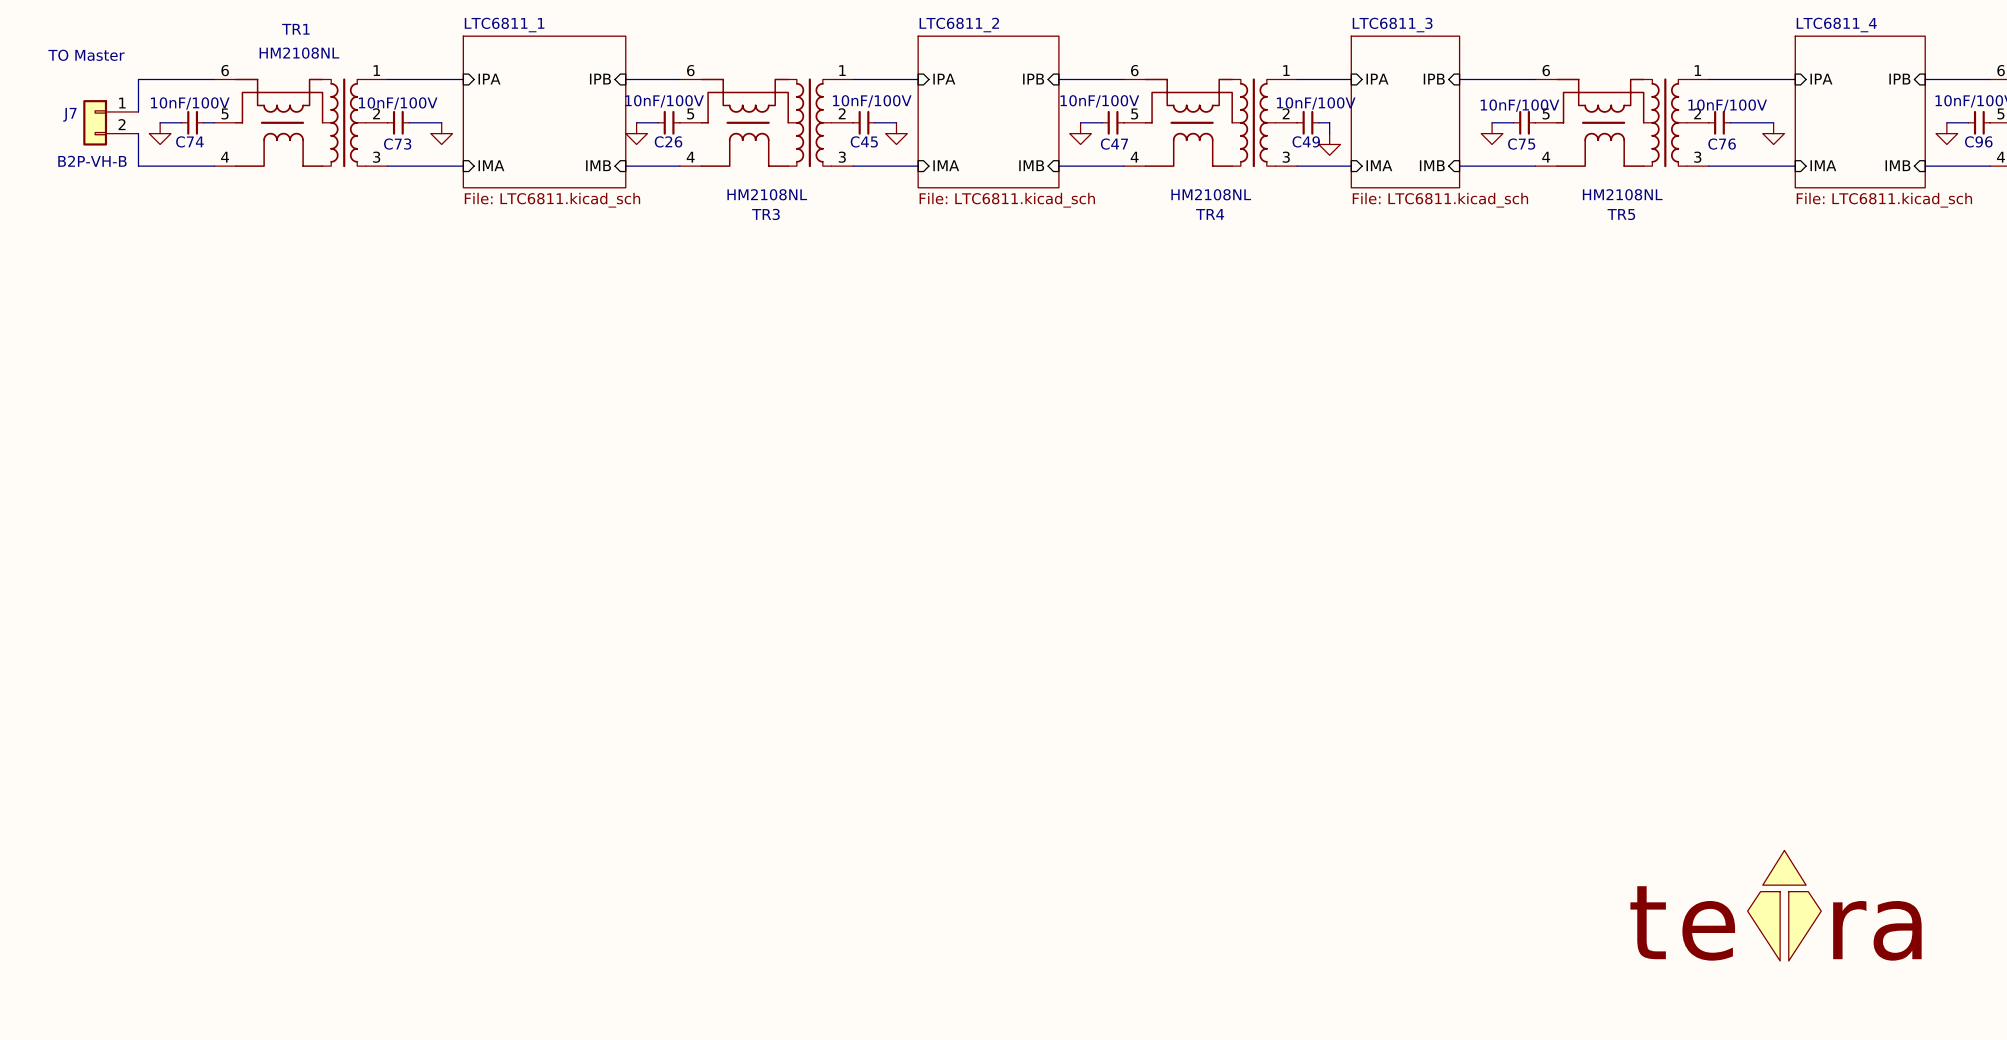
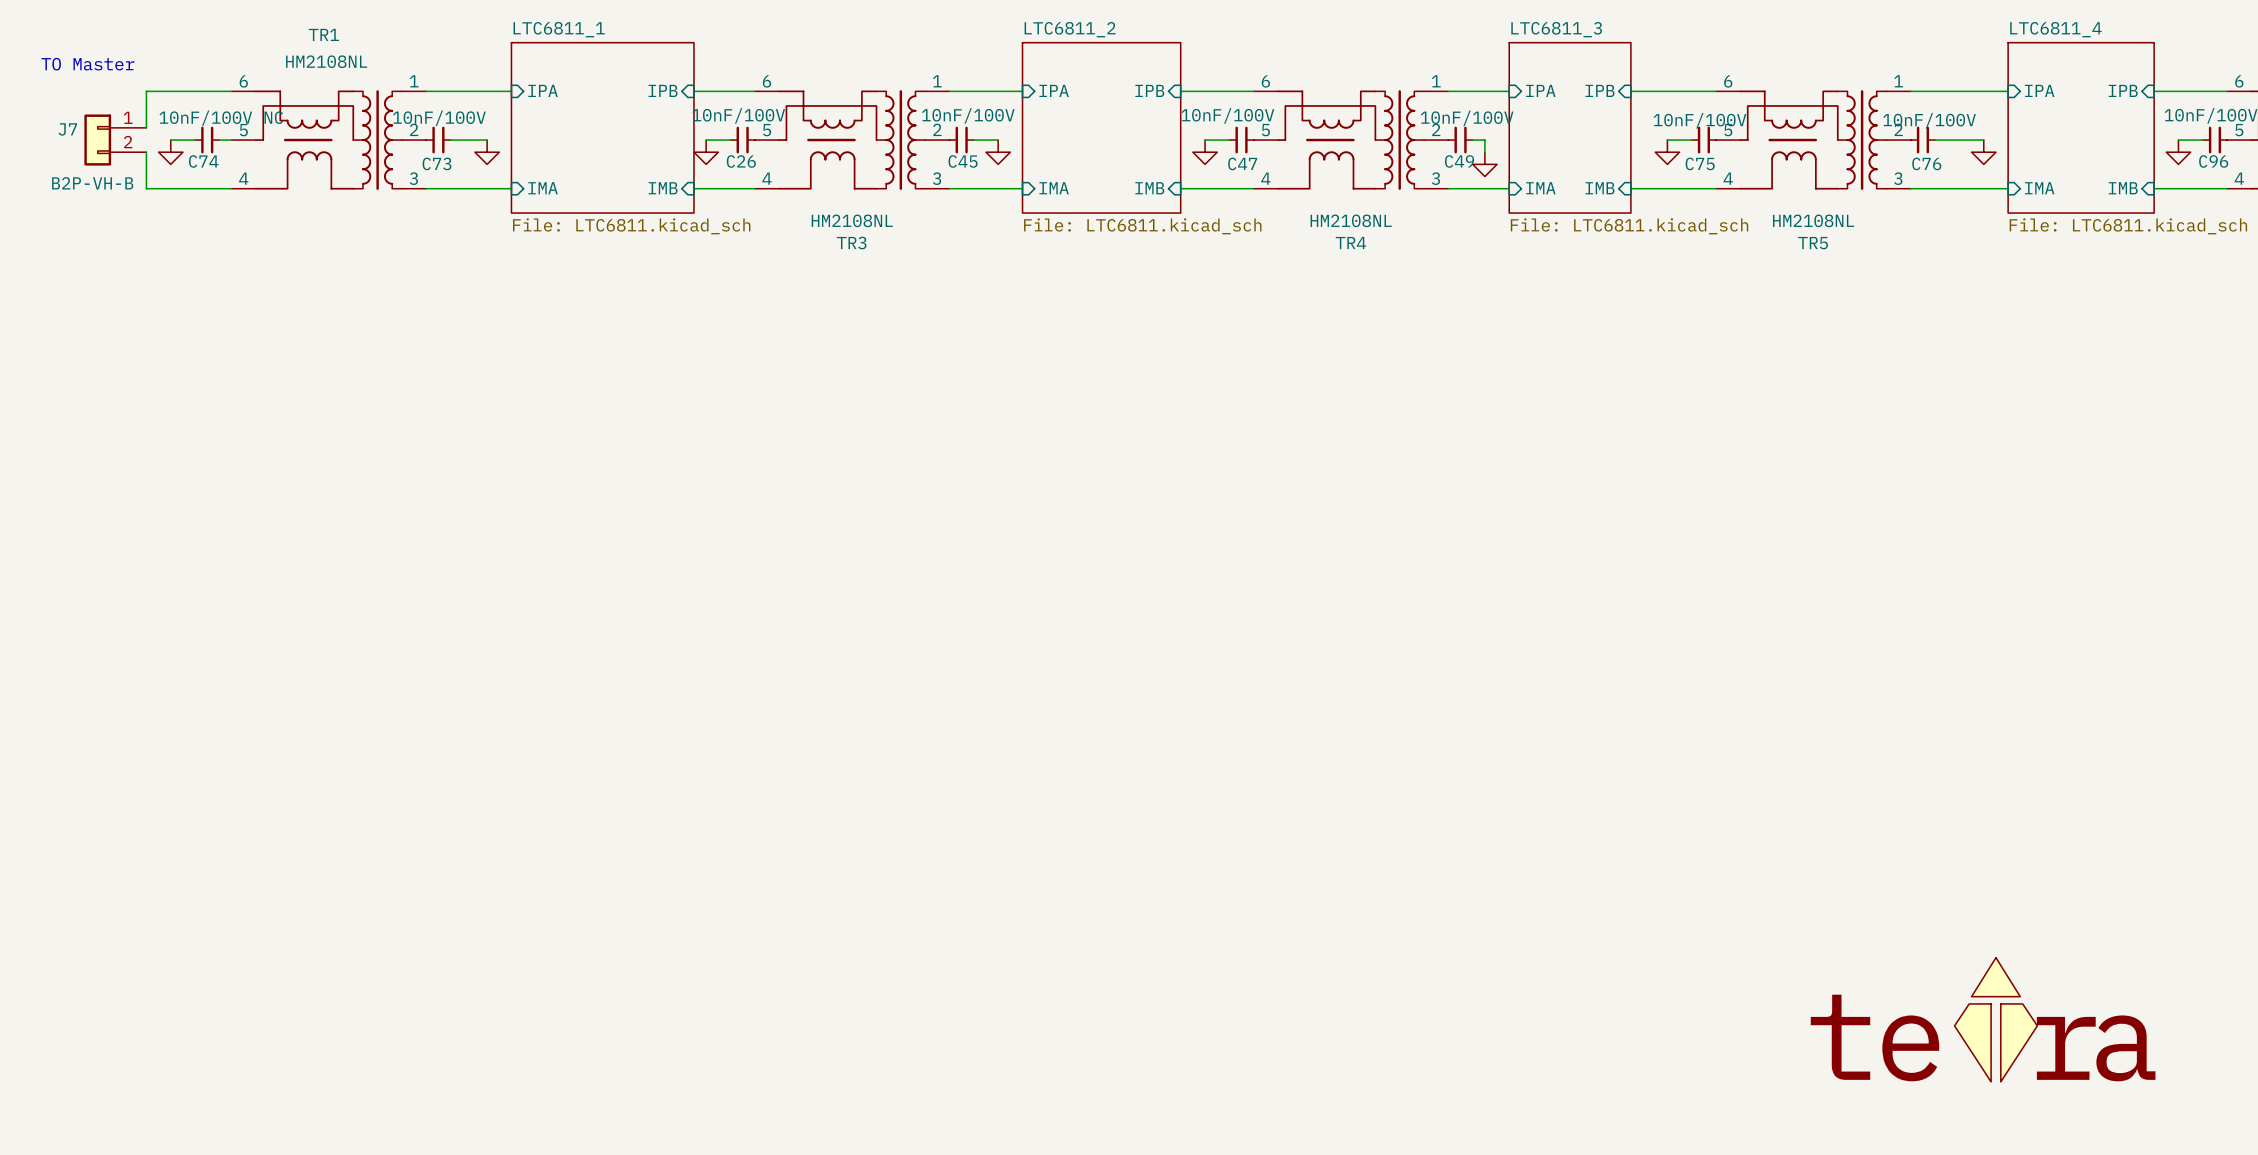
C74 value: 10nF/100V (190, 103) -> 10nF/100V NC (221, 118)

